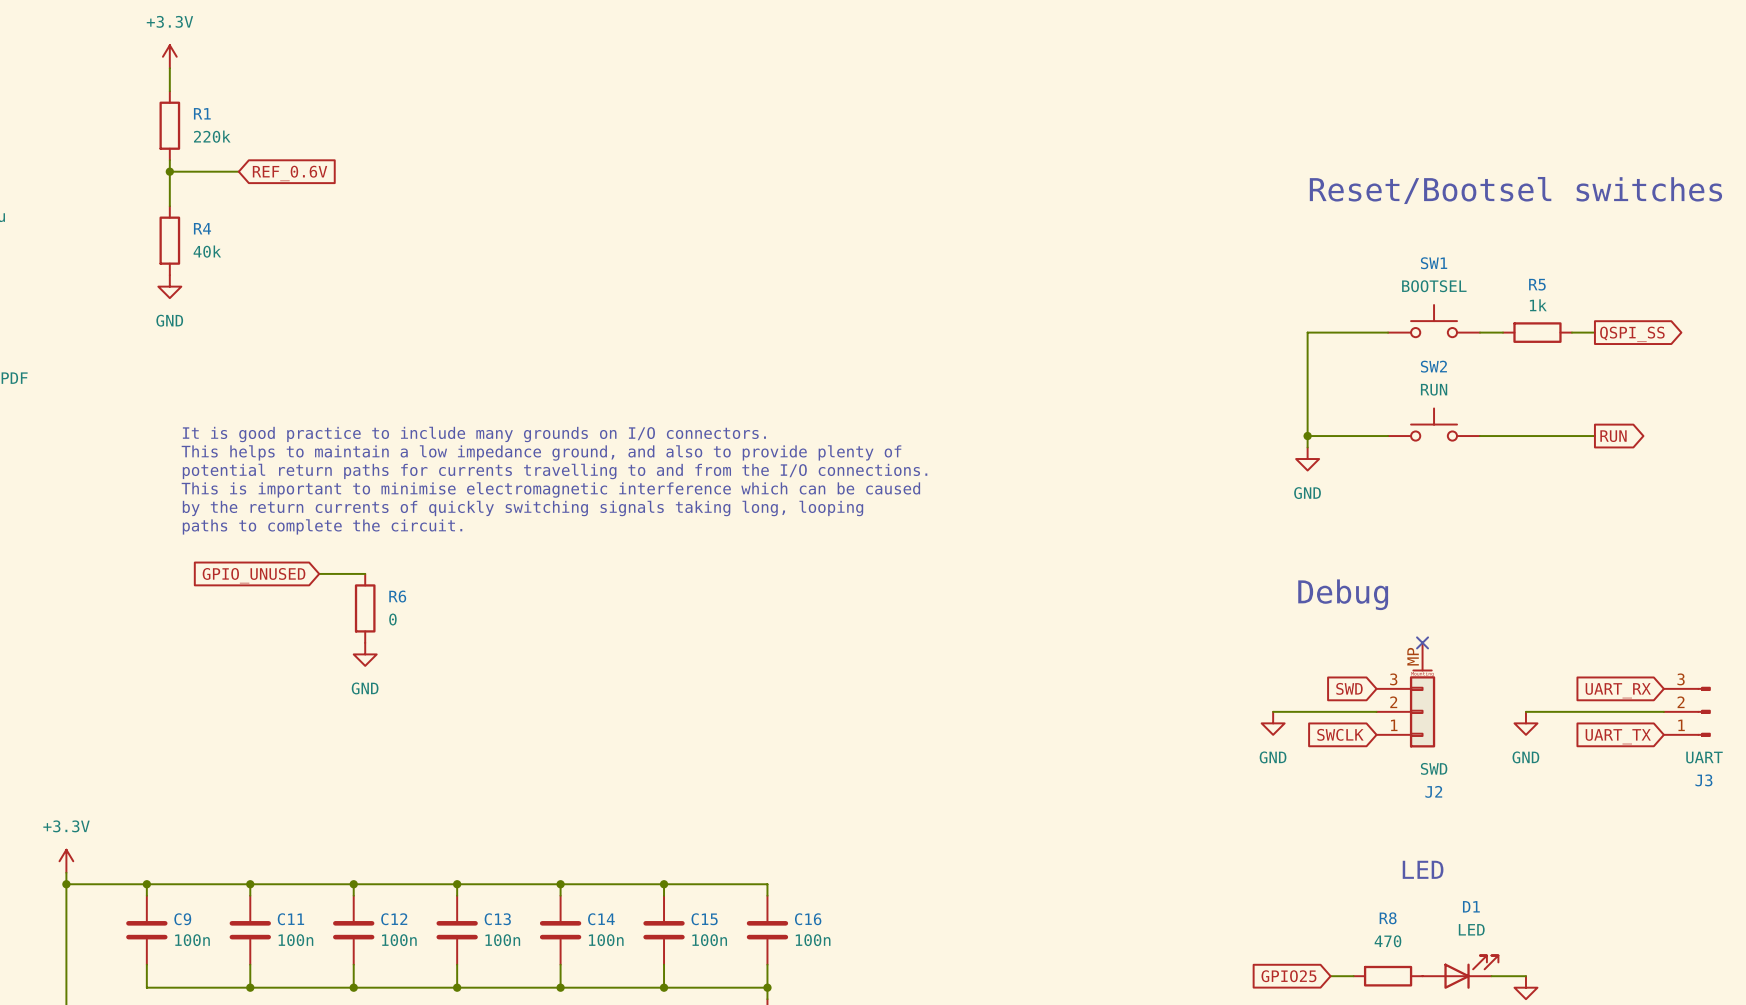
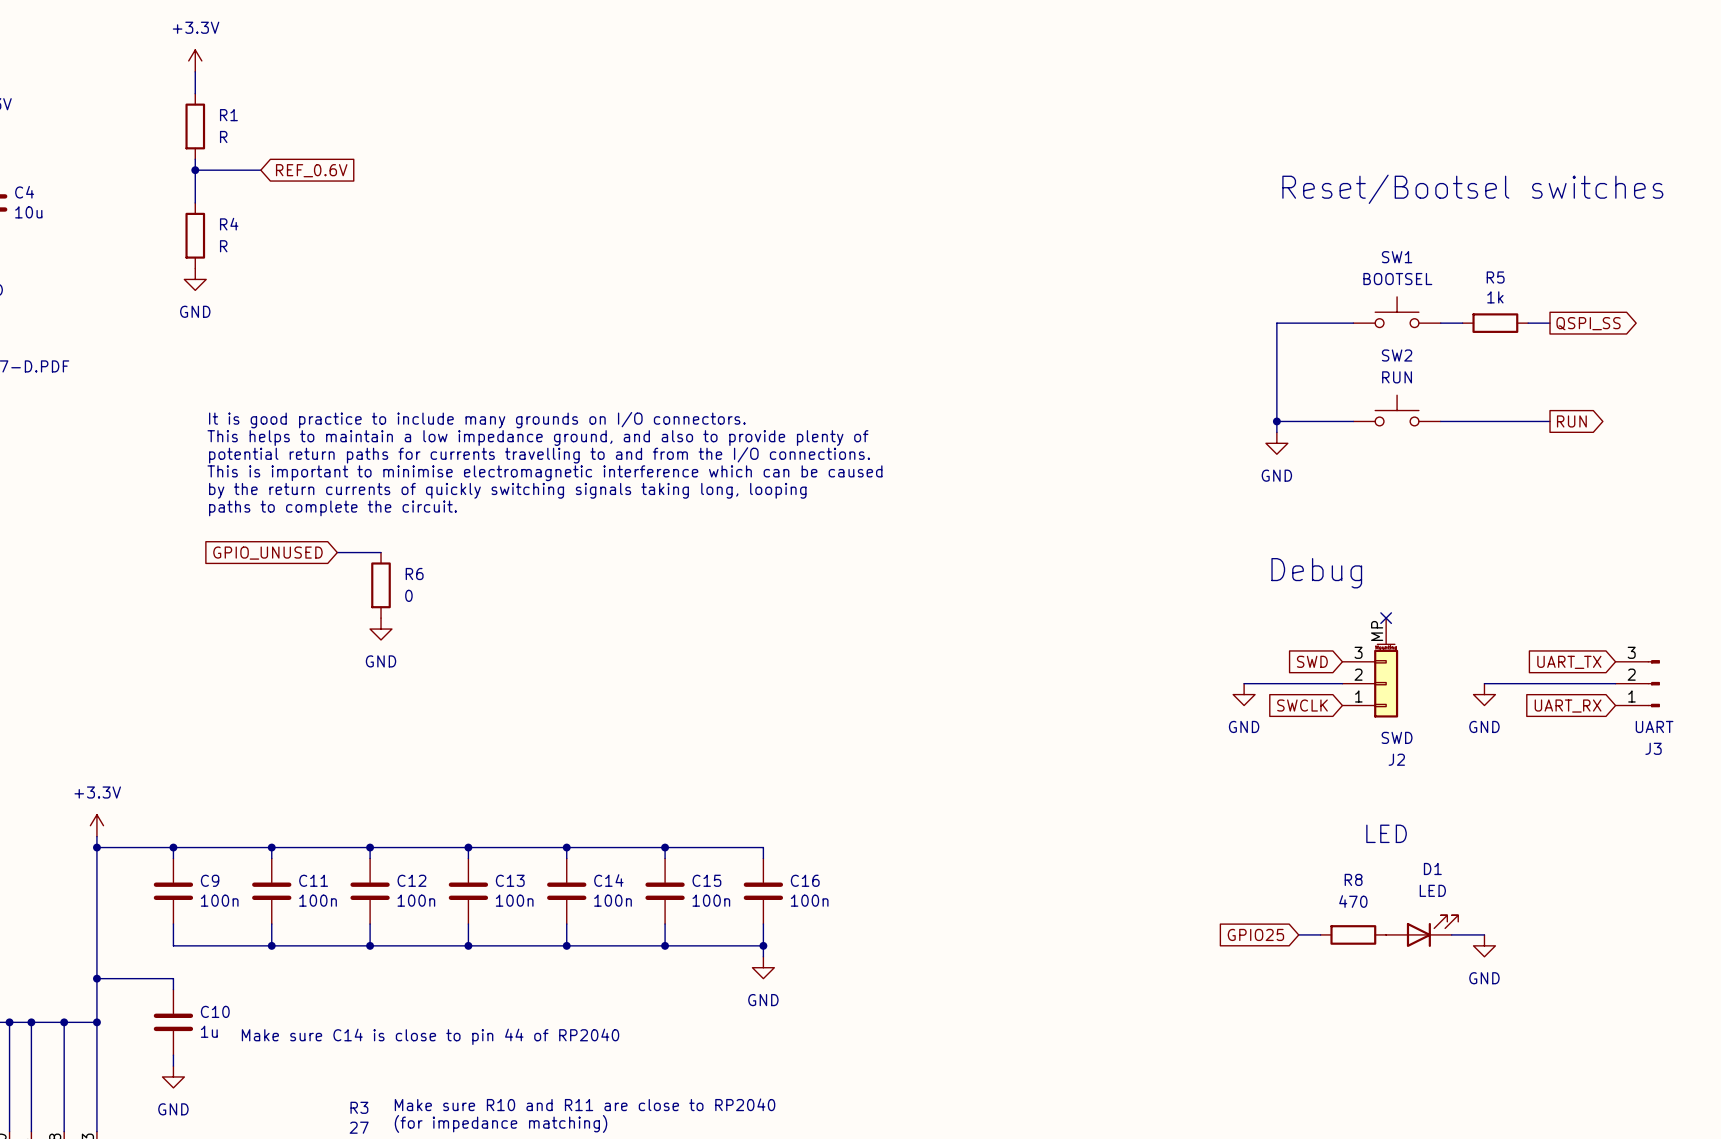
R1 value: 220k (212, 136) -> R (223, 136)
R4 value: 40k (207, 251) -> R (223, 246)
global label: UART_RX (1618, 690) -> UART_TX (1569, 662)
global label: UART_TX (1618, 736) -> UART_RX (1568, 706)

